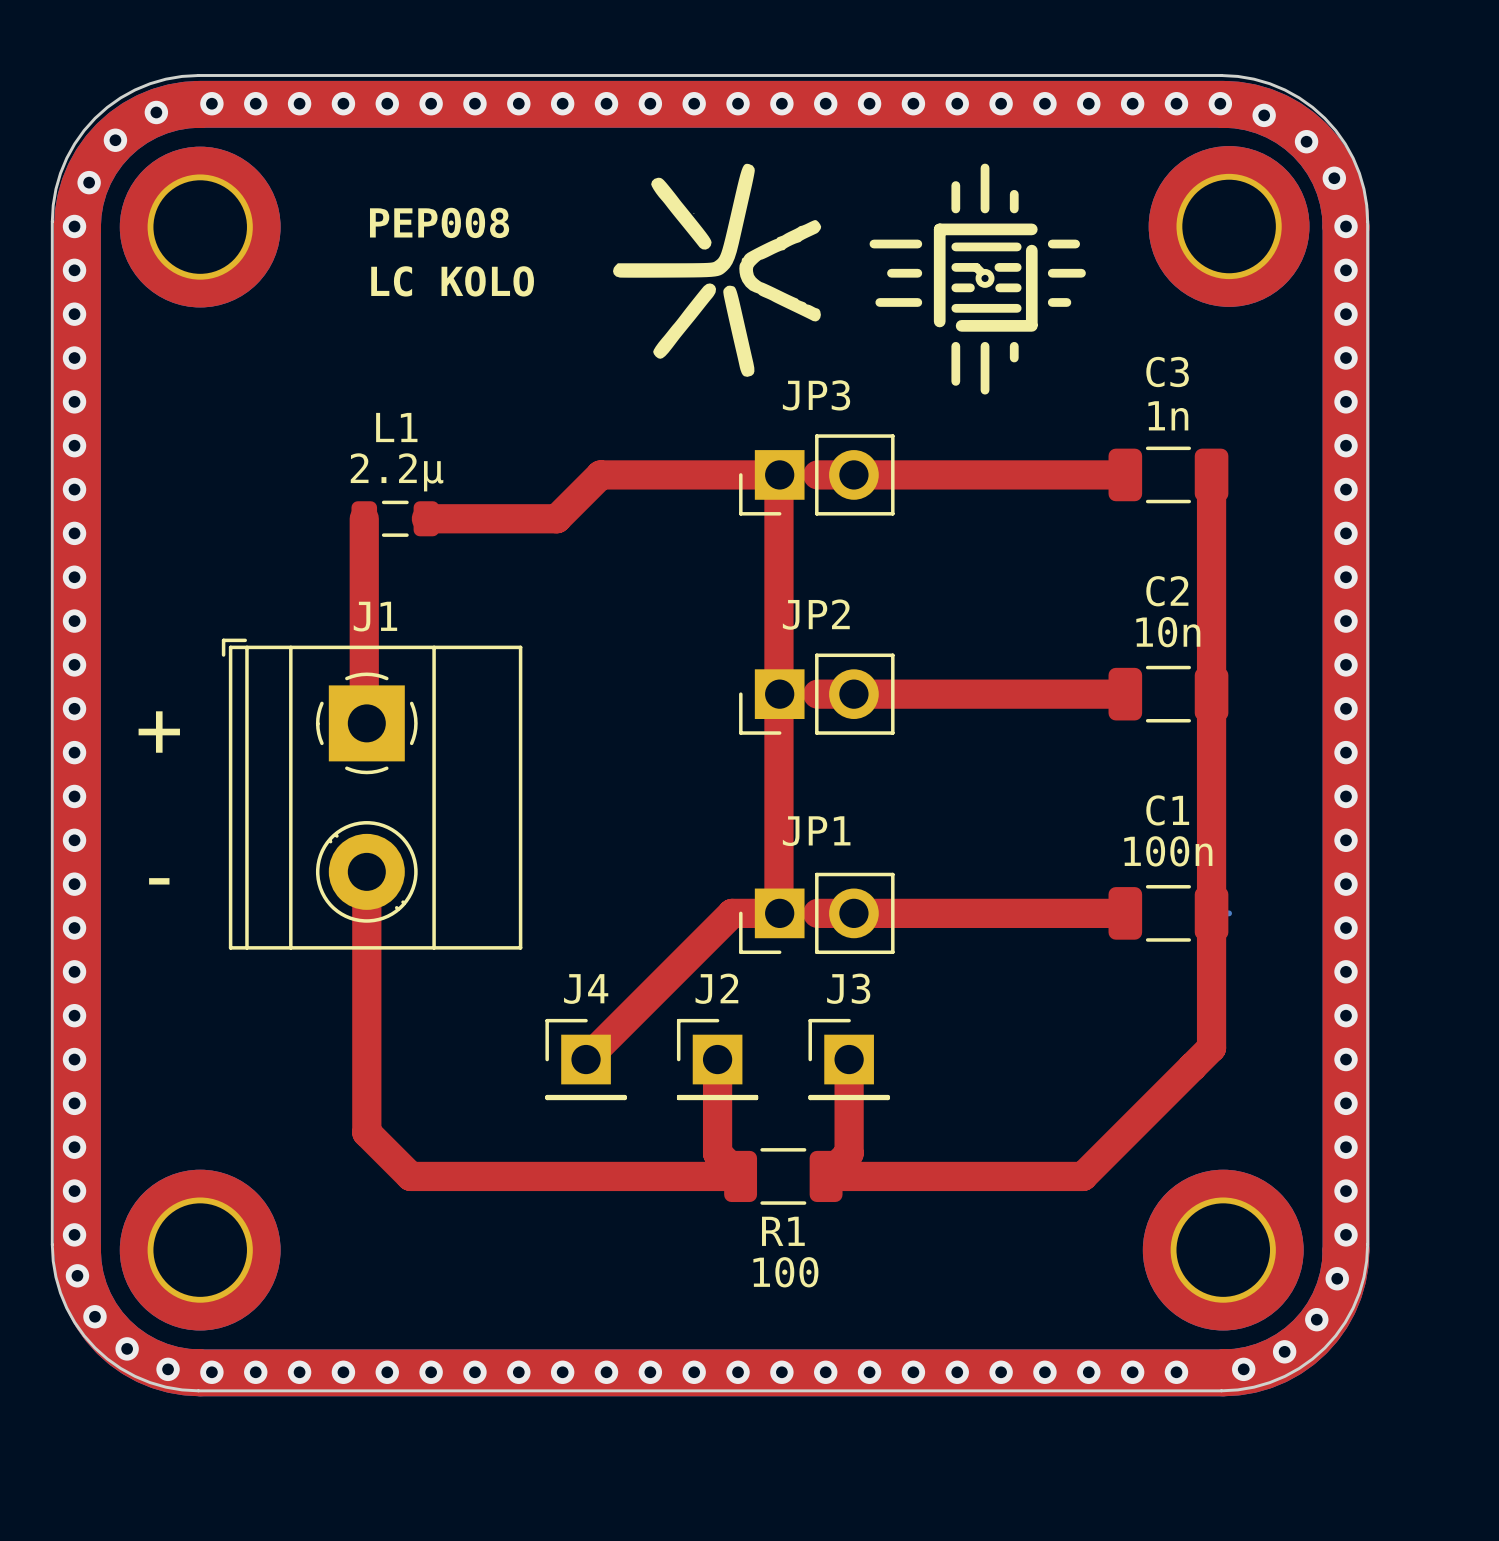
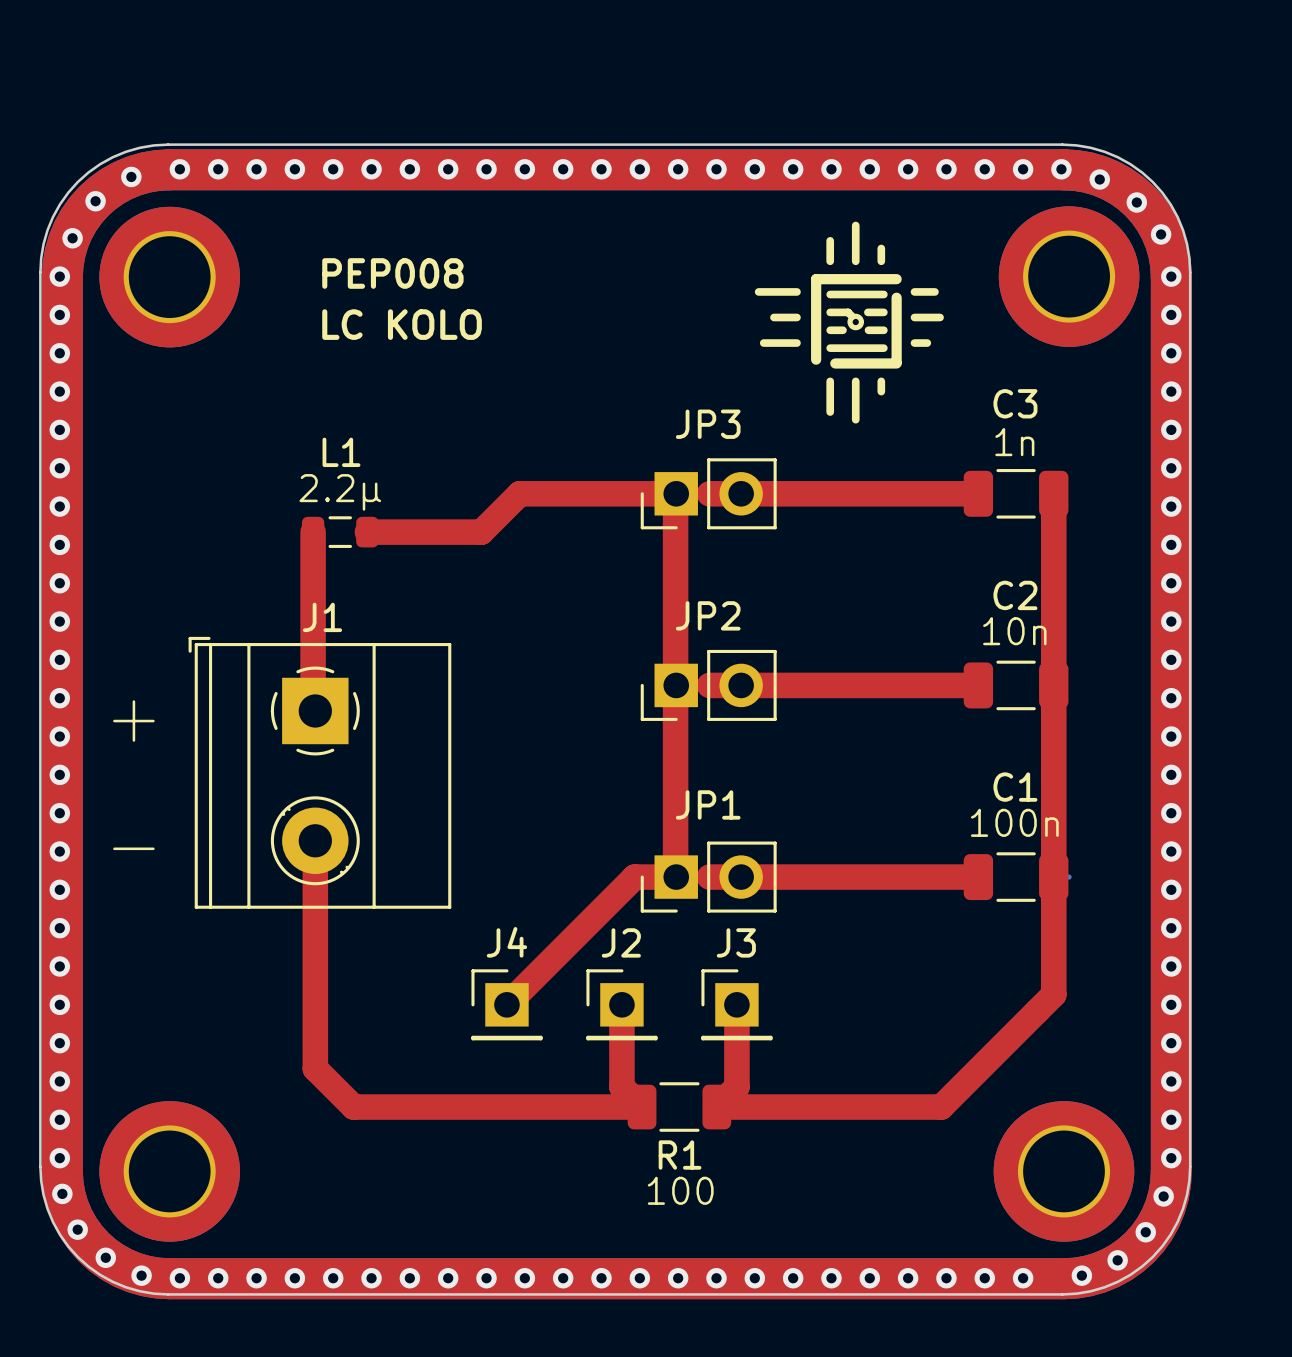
drawing: [613, 163, 822, 377] -> none

